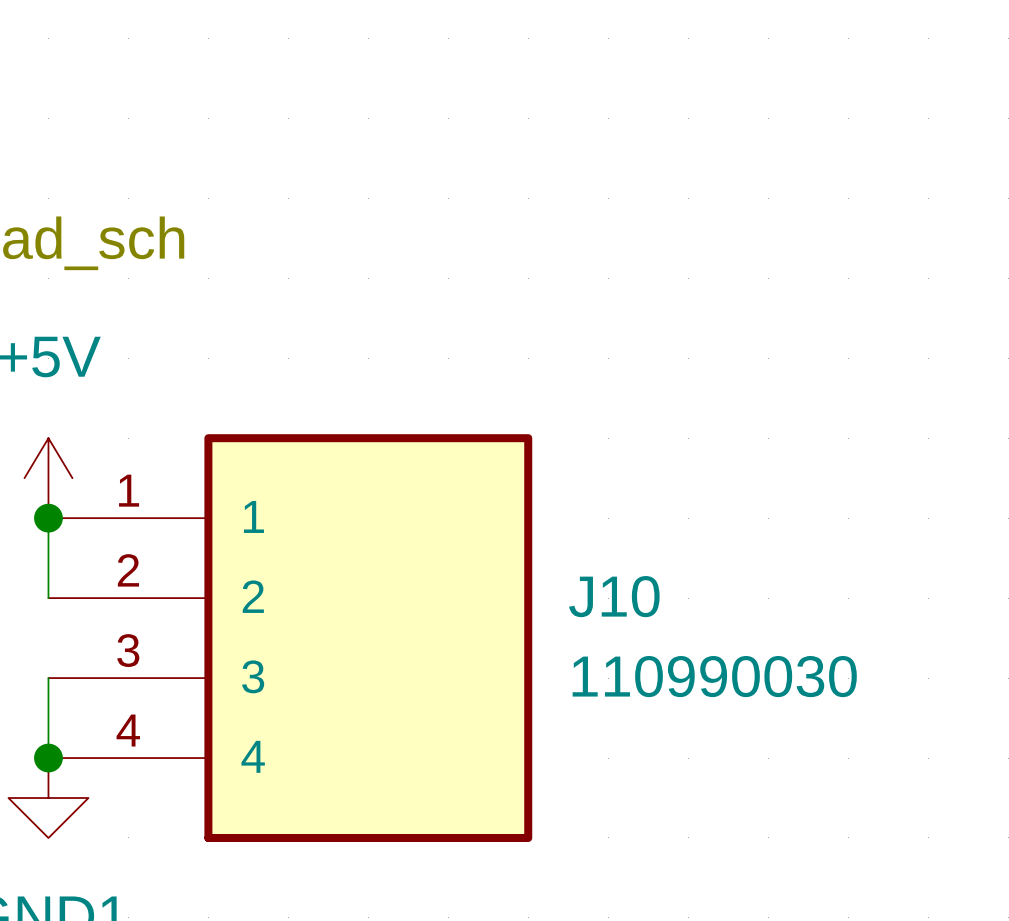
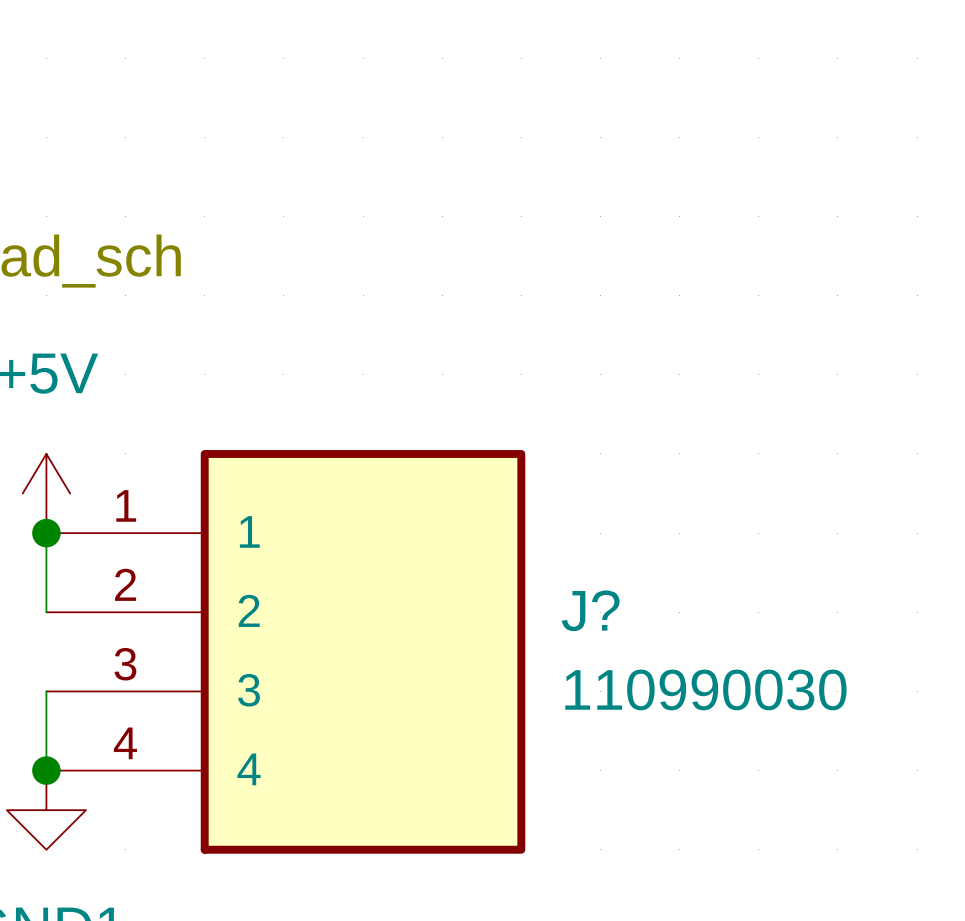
J10 name: J10 (614, 596) -> J? (590, 610)

